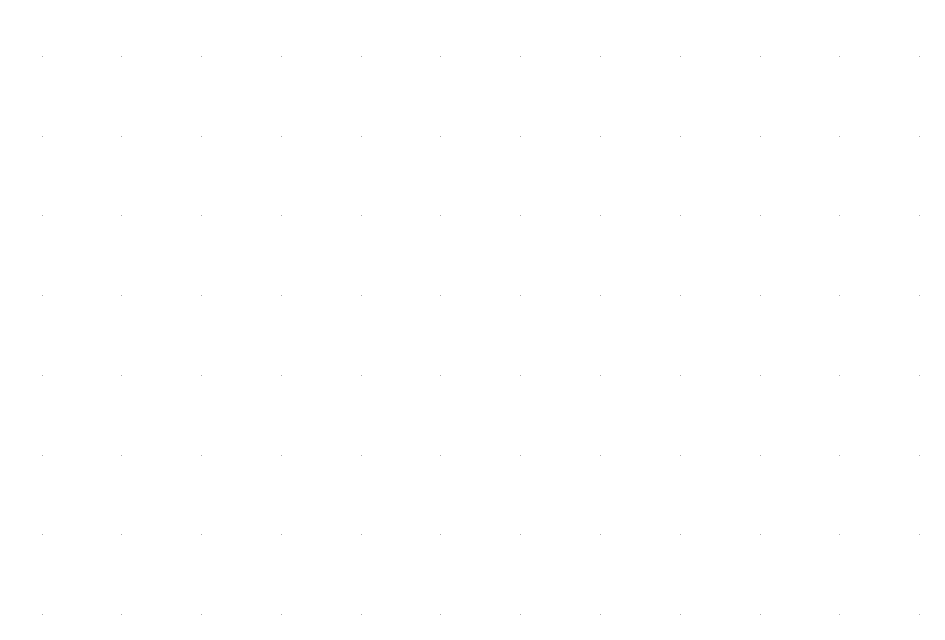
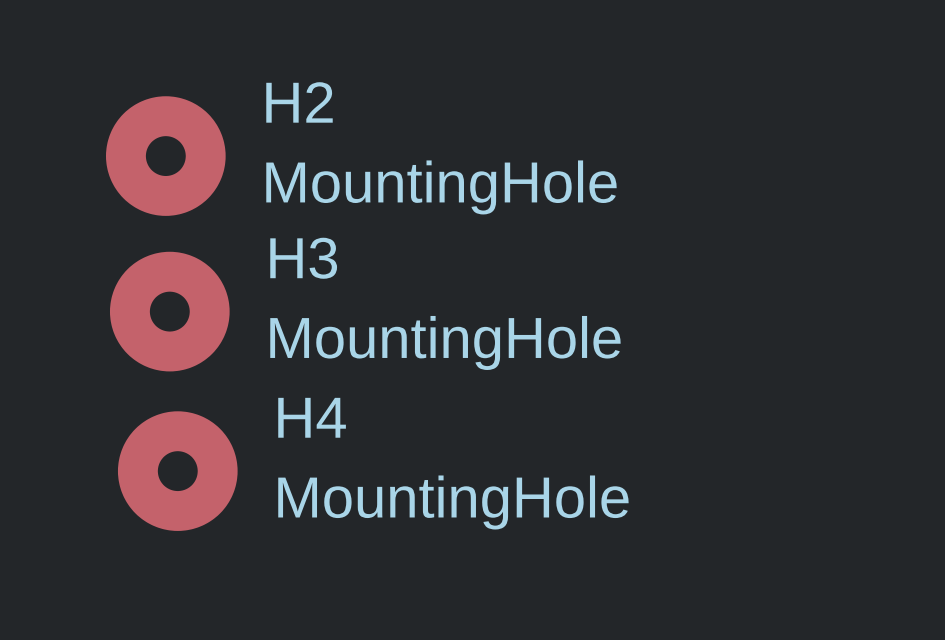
H2: none -> MountingHole (165, 156)
H3: none -> MountingHole (169, 311)
H4: none -> MountingHole (177, 471)

